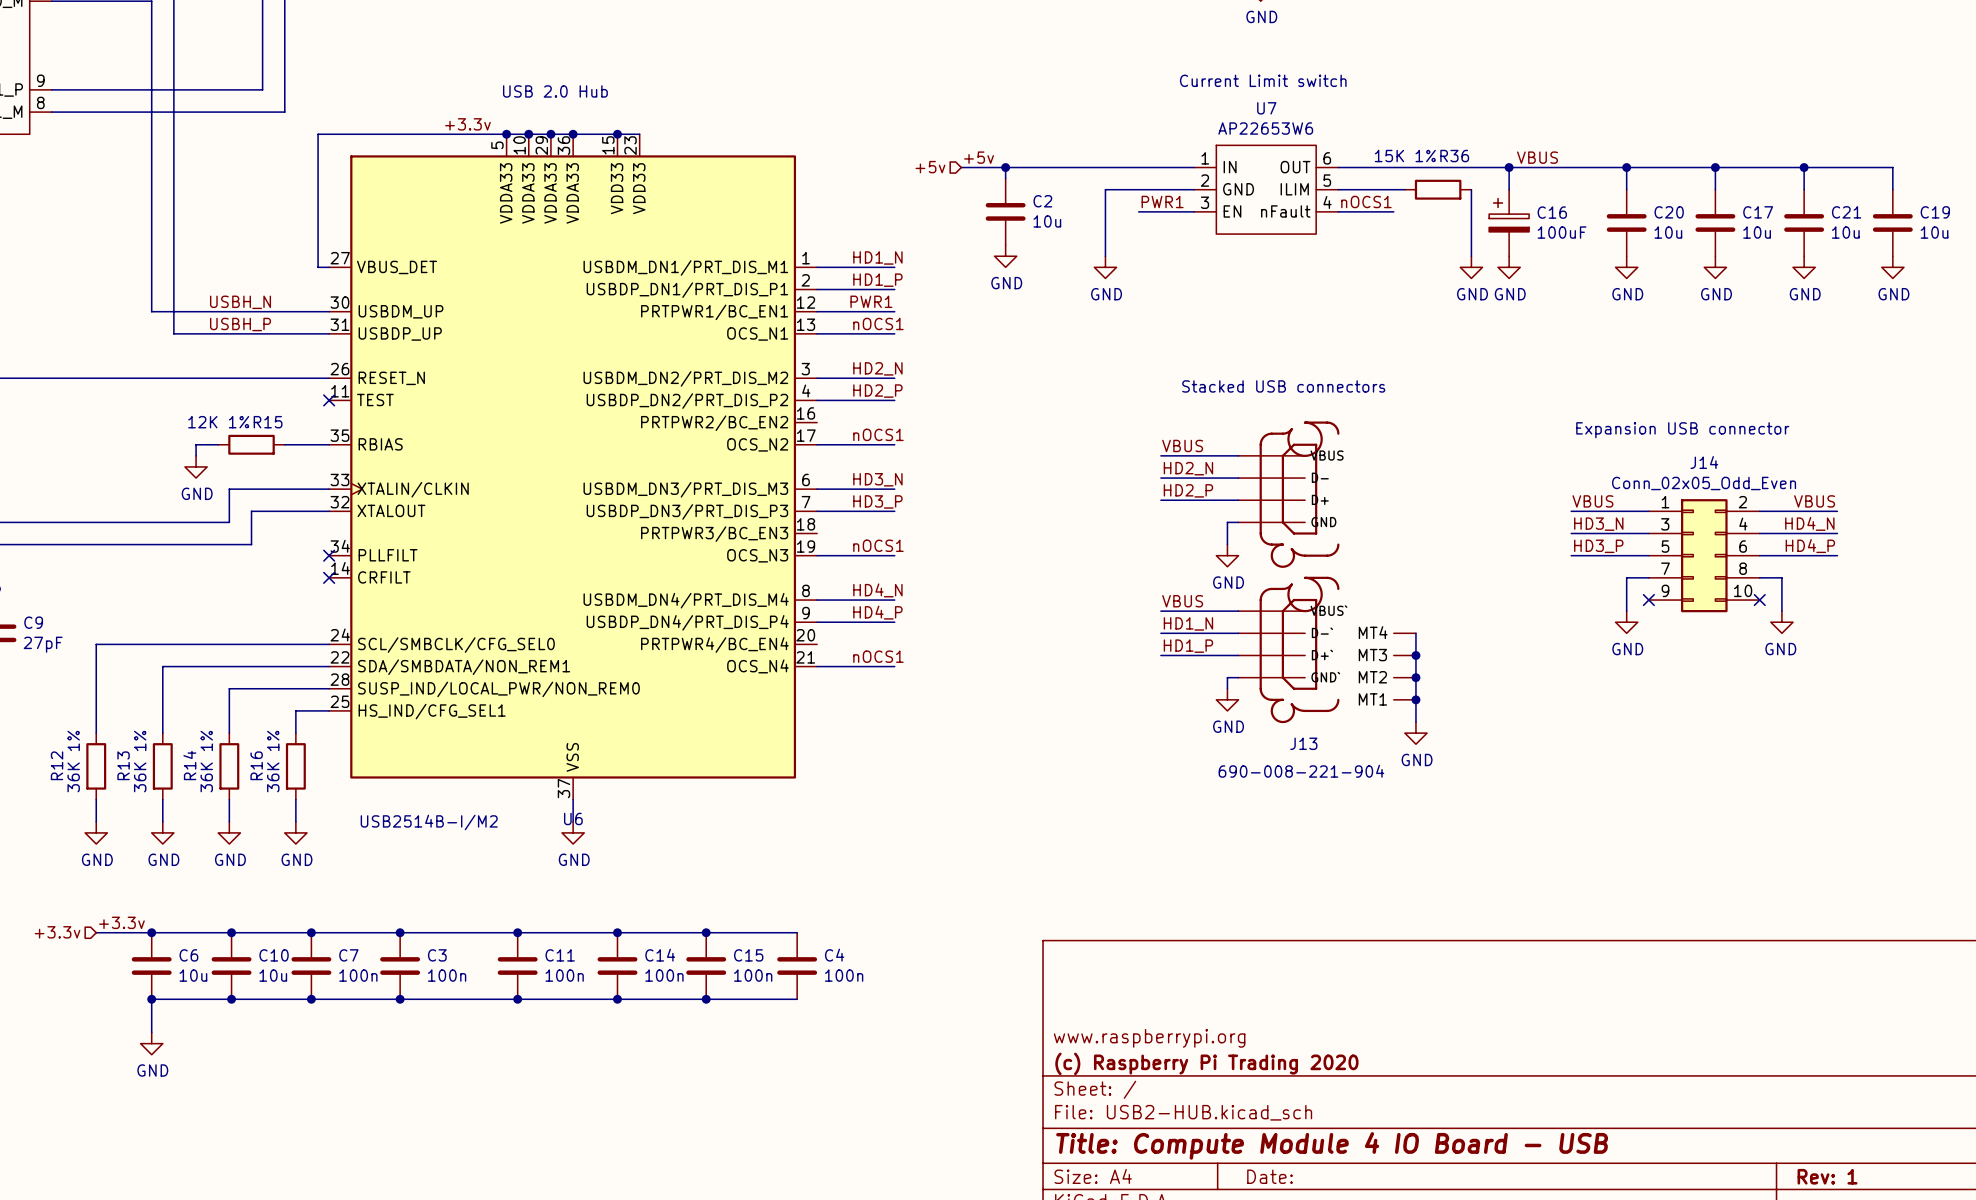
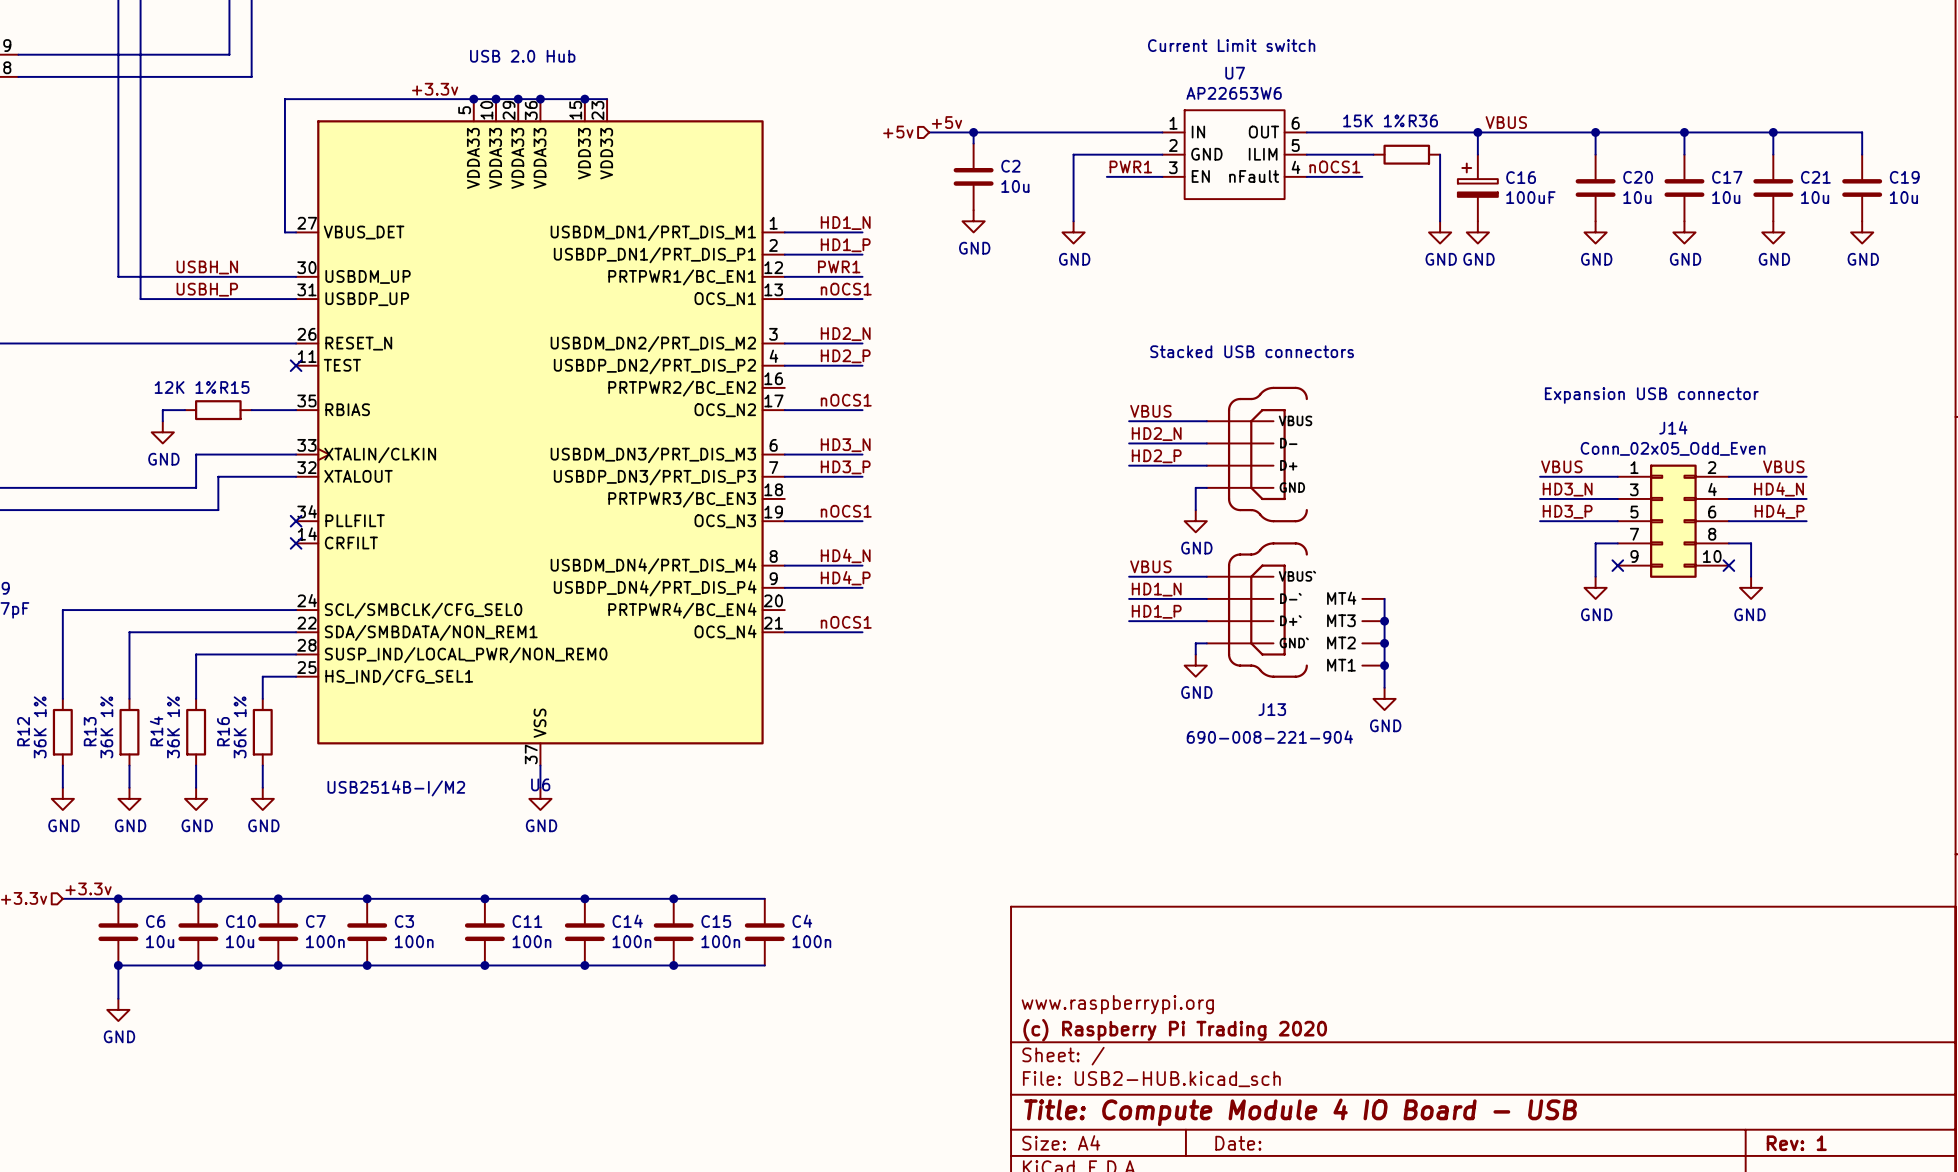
J13 symbol: [1238, 421, 1416, 724] -> [1206, 386, 1385, 678]

